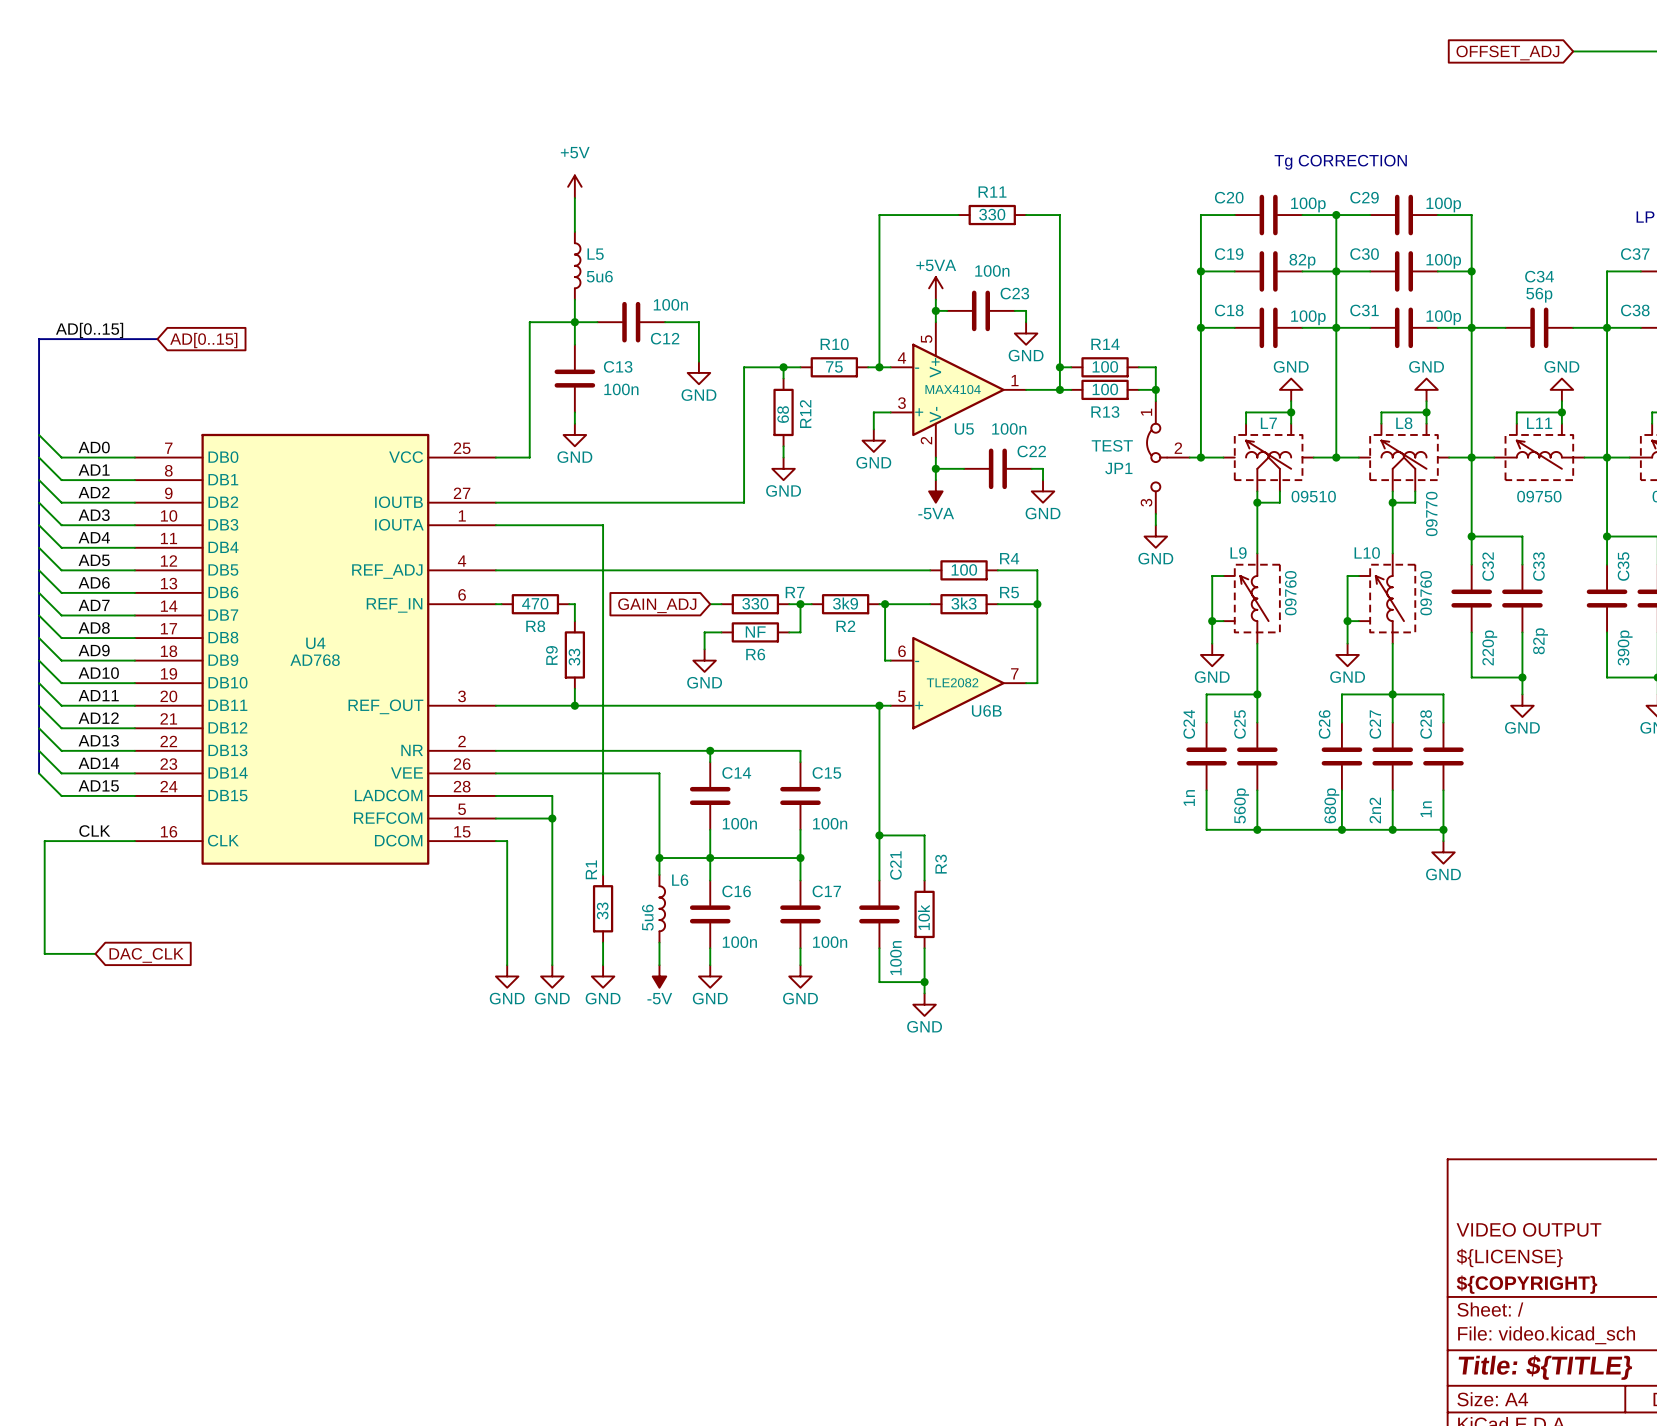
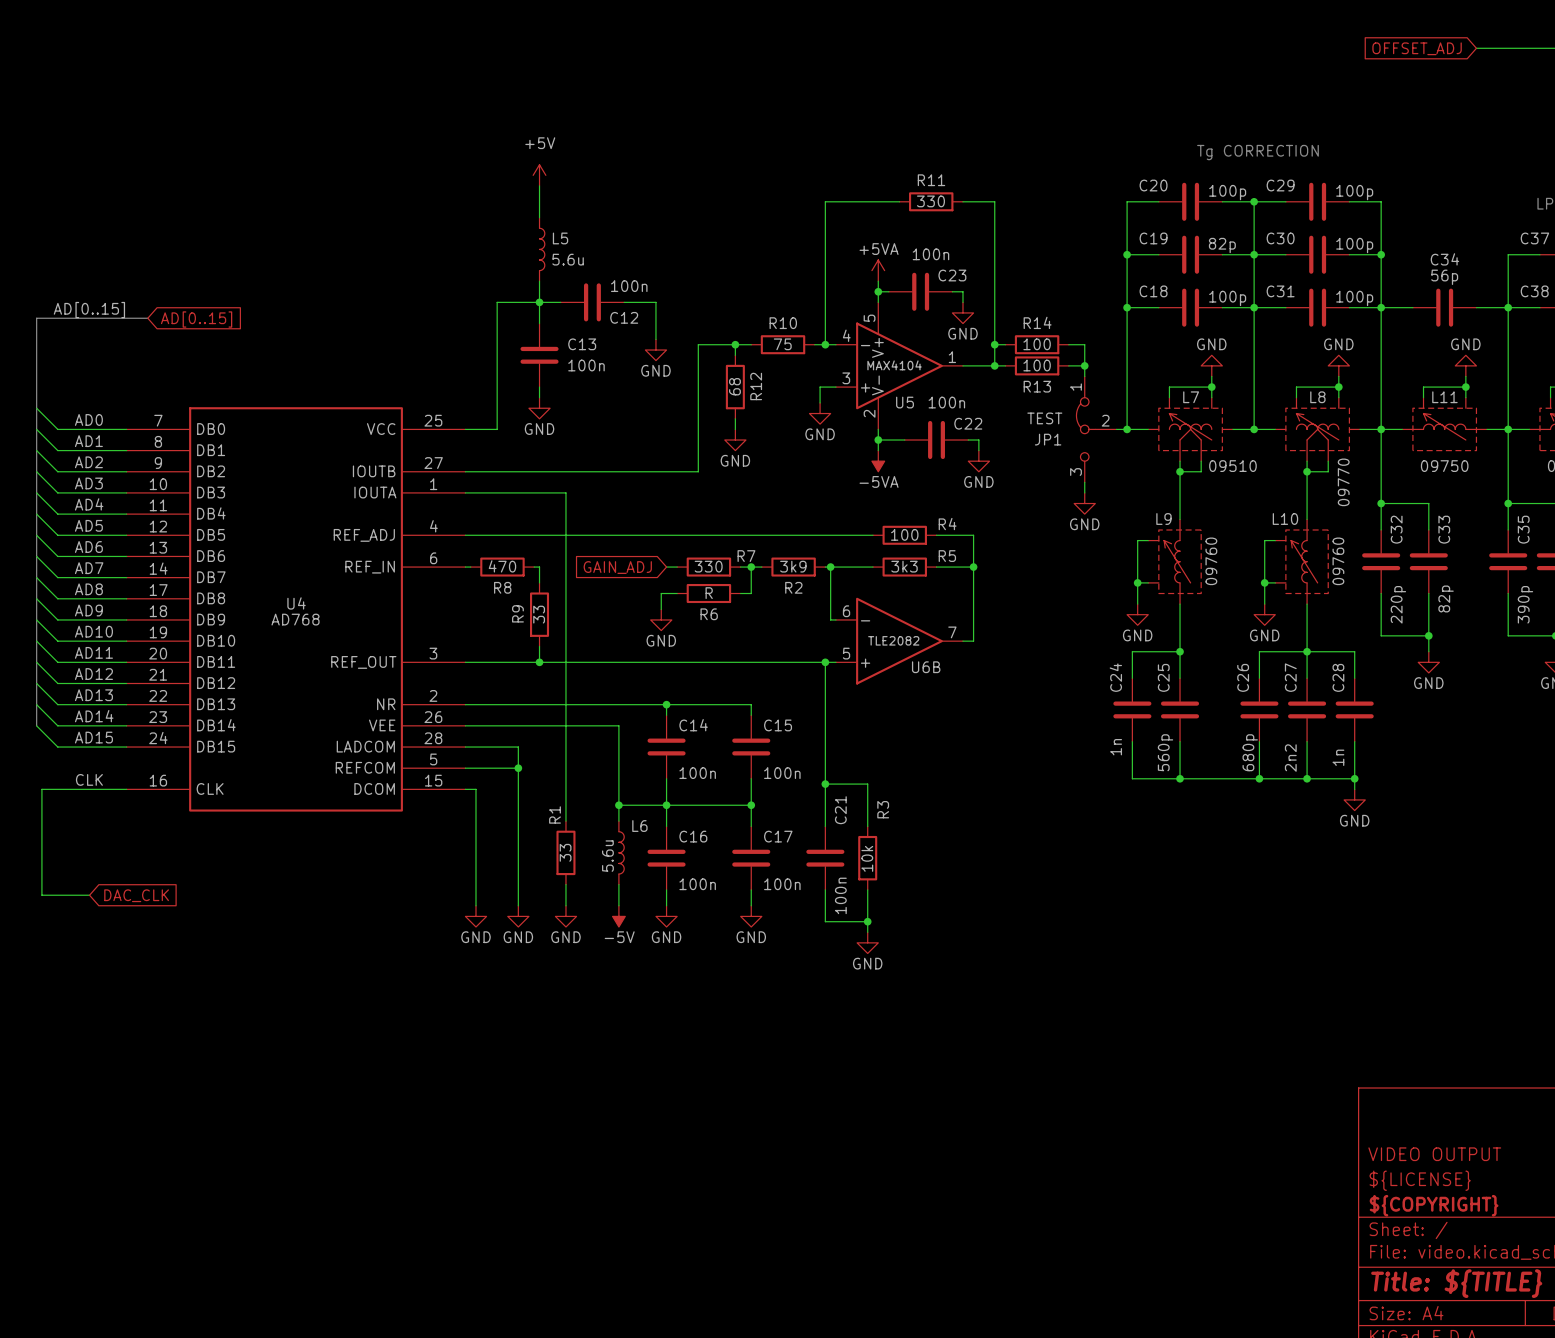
L5 value: 5u6 (599, 276) -> 5.6u (568, 259)
R6 value: NF (755, 631) -> R (709, 593)
L6 value: 5u6 (647, 917) -> 5.6u (607, 856)

